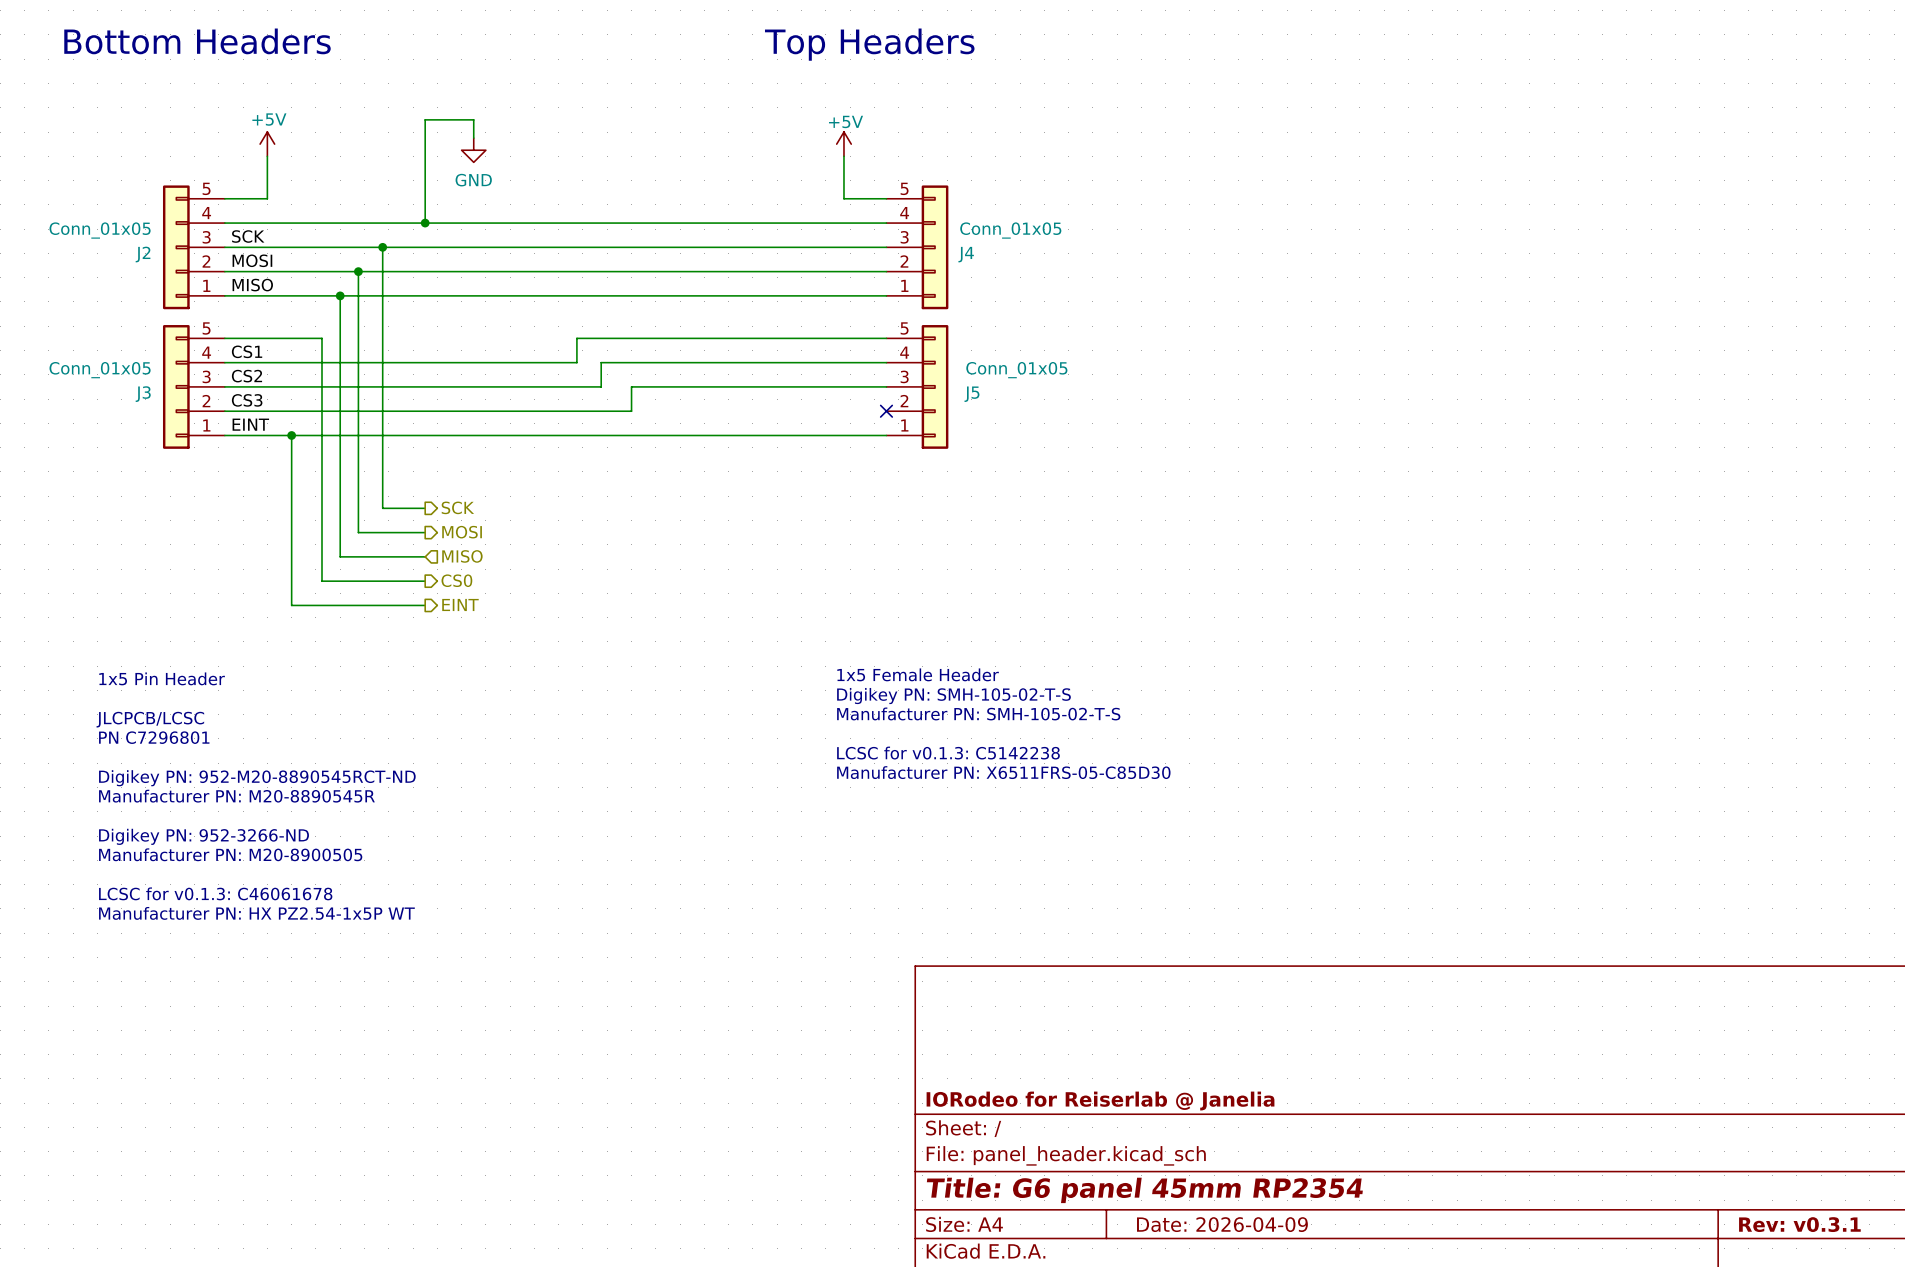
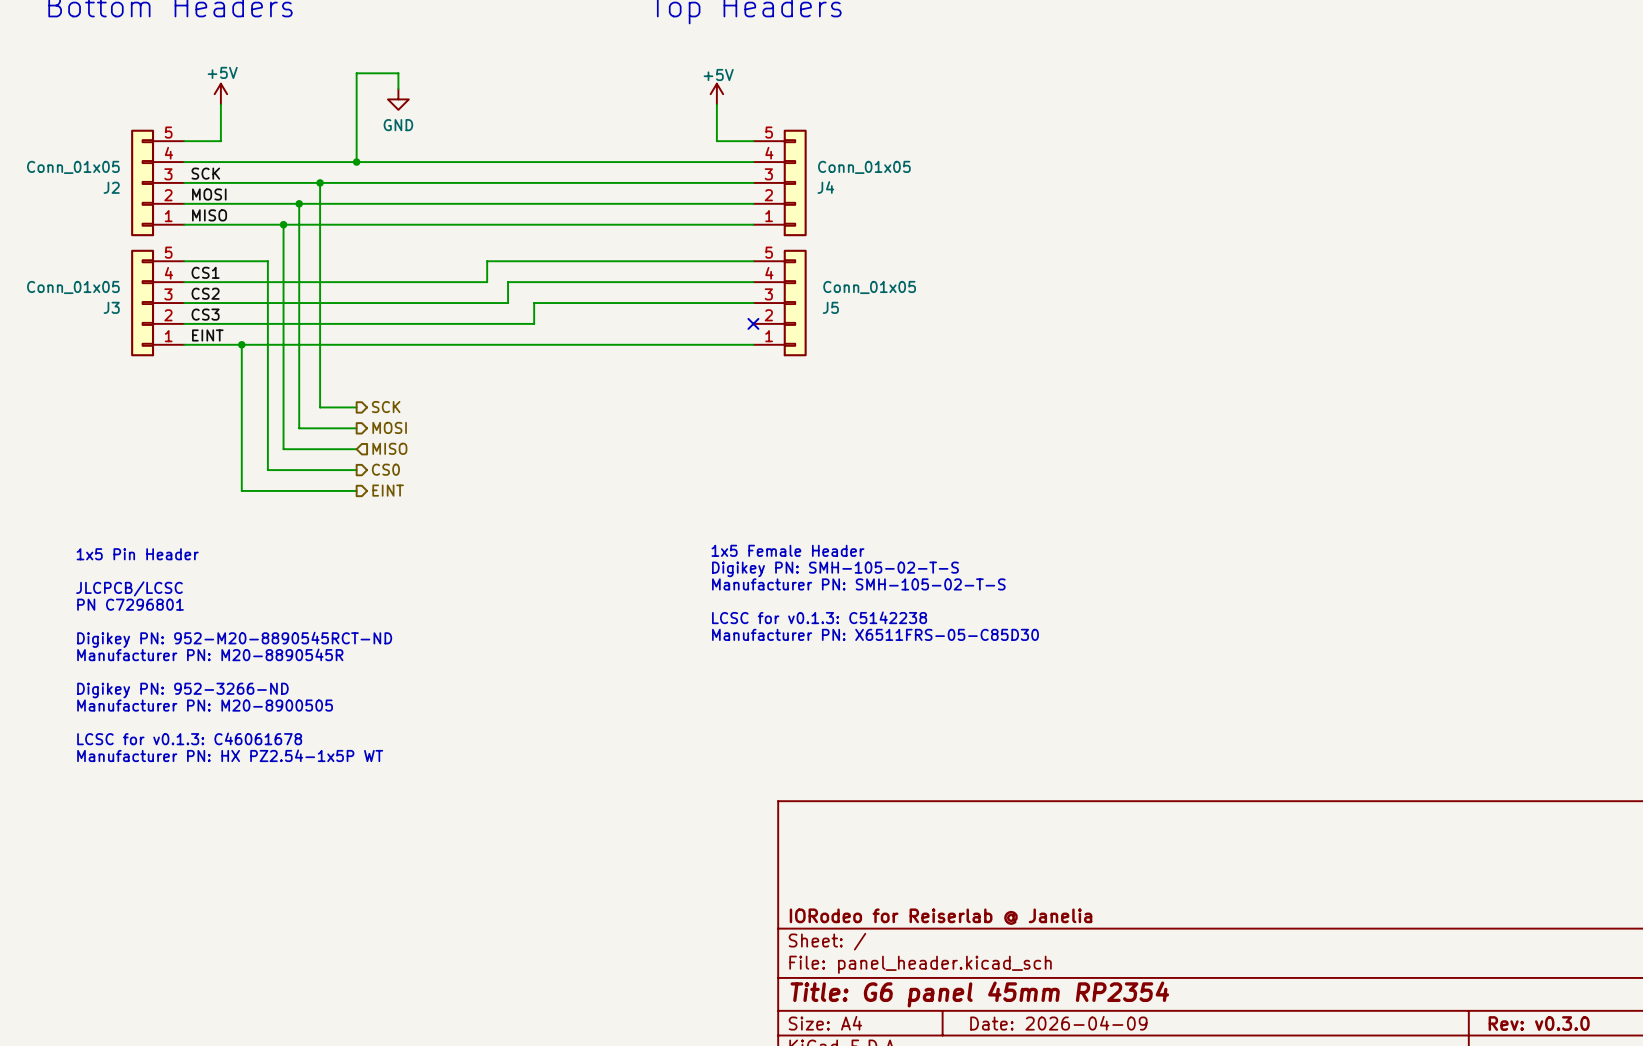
title block: Rev: v0.3.1 (1799, 1224) -> Rev: v0.3.0 (1539, 1023)

